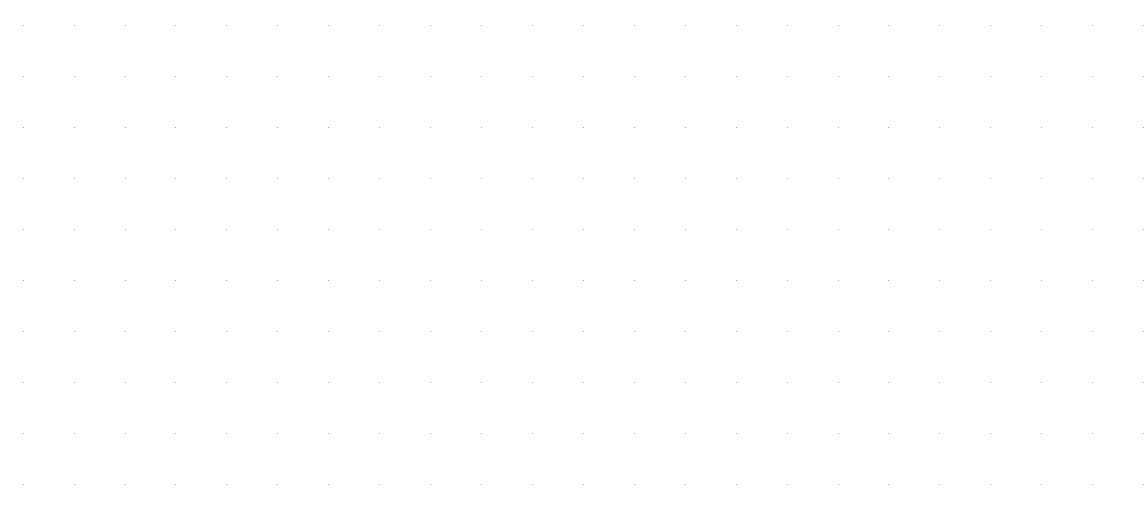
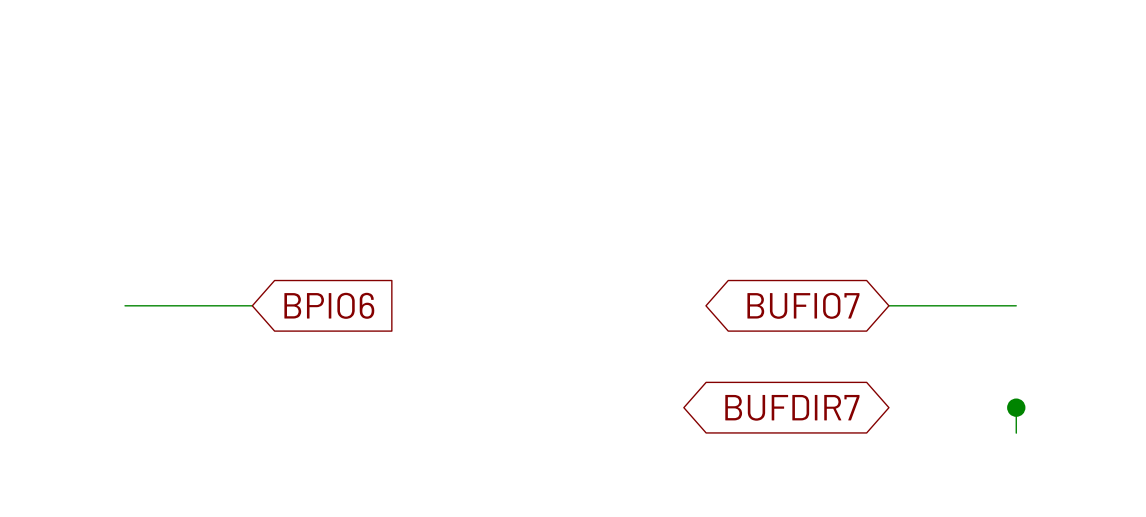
wire: none -> (125, 305) (252, 305)
global label: none -> BPIO6 (329, 305)
global label: none -> BUFIO7 (803, 305)
wire: none -> (888, 305) (1016, 305)
global label: none -> BUFDIR7 (792, 407)
wire: none -> (1016, 407) (1016, 433)
junction: none -> (1016, 407)

